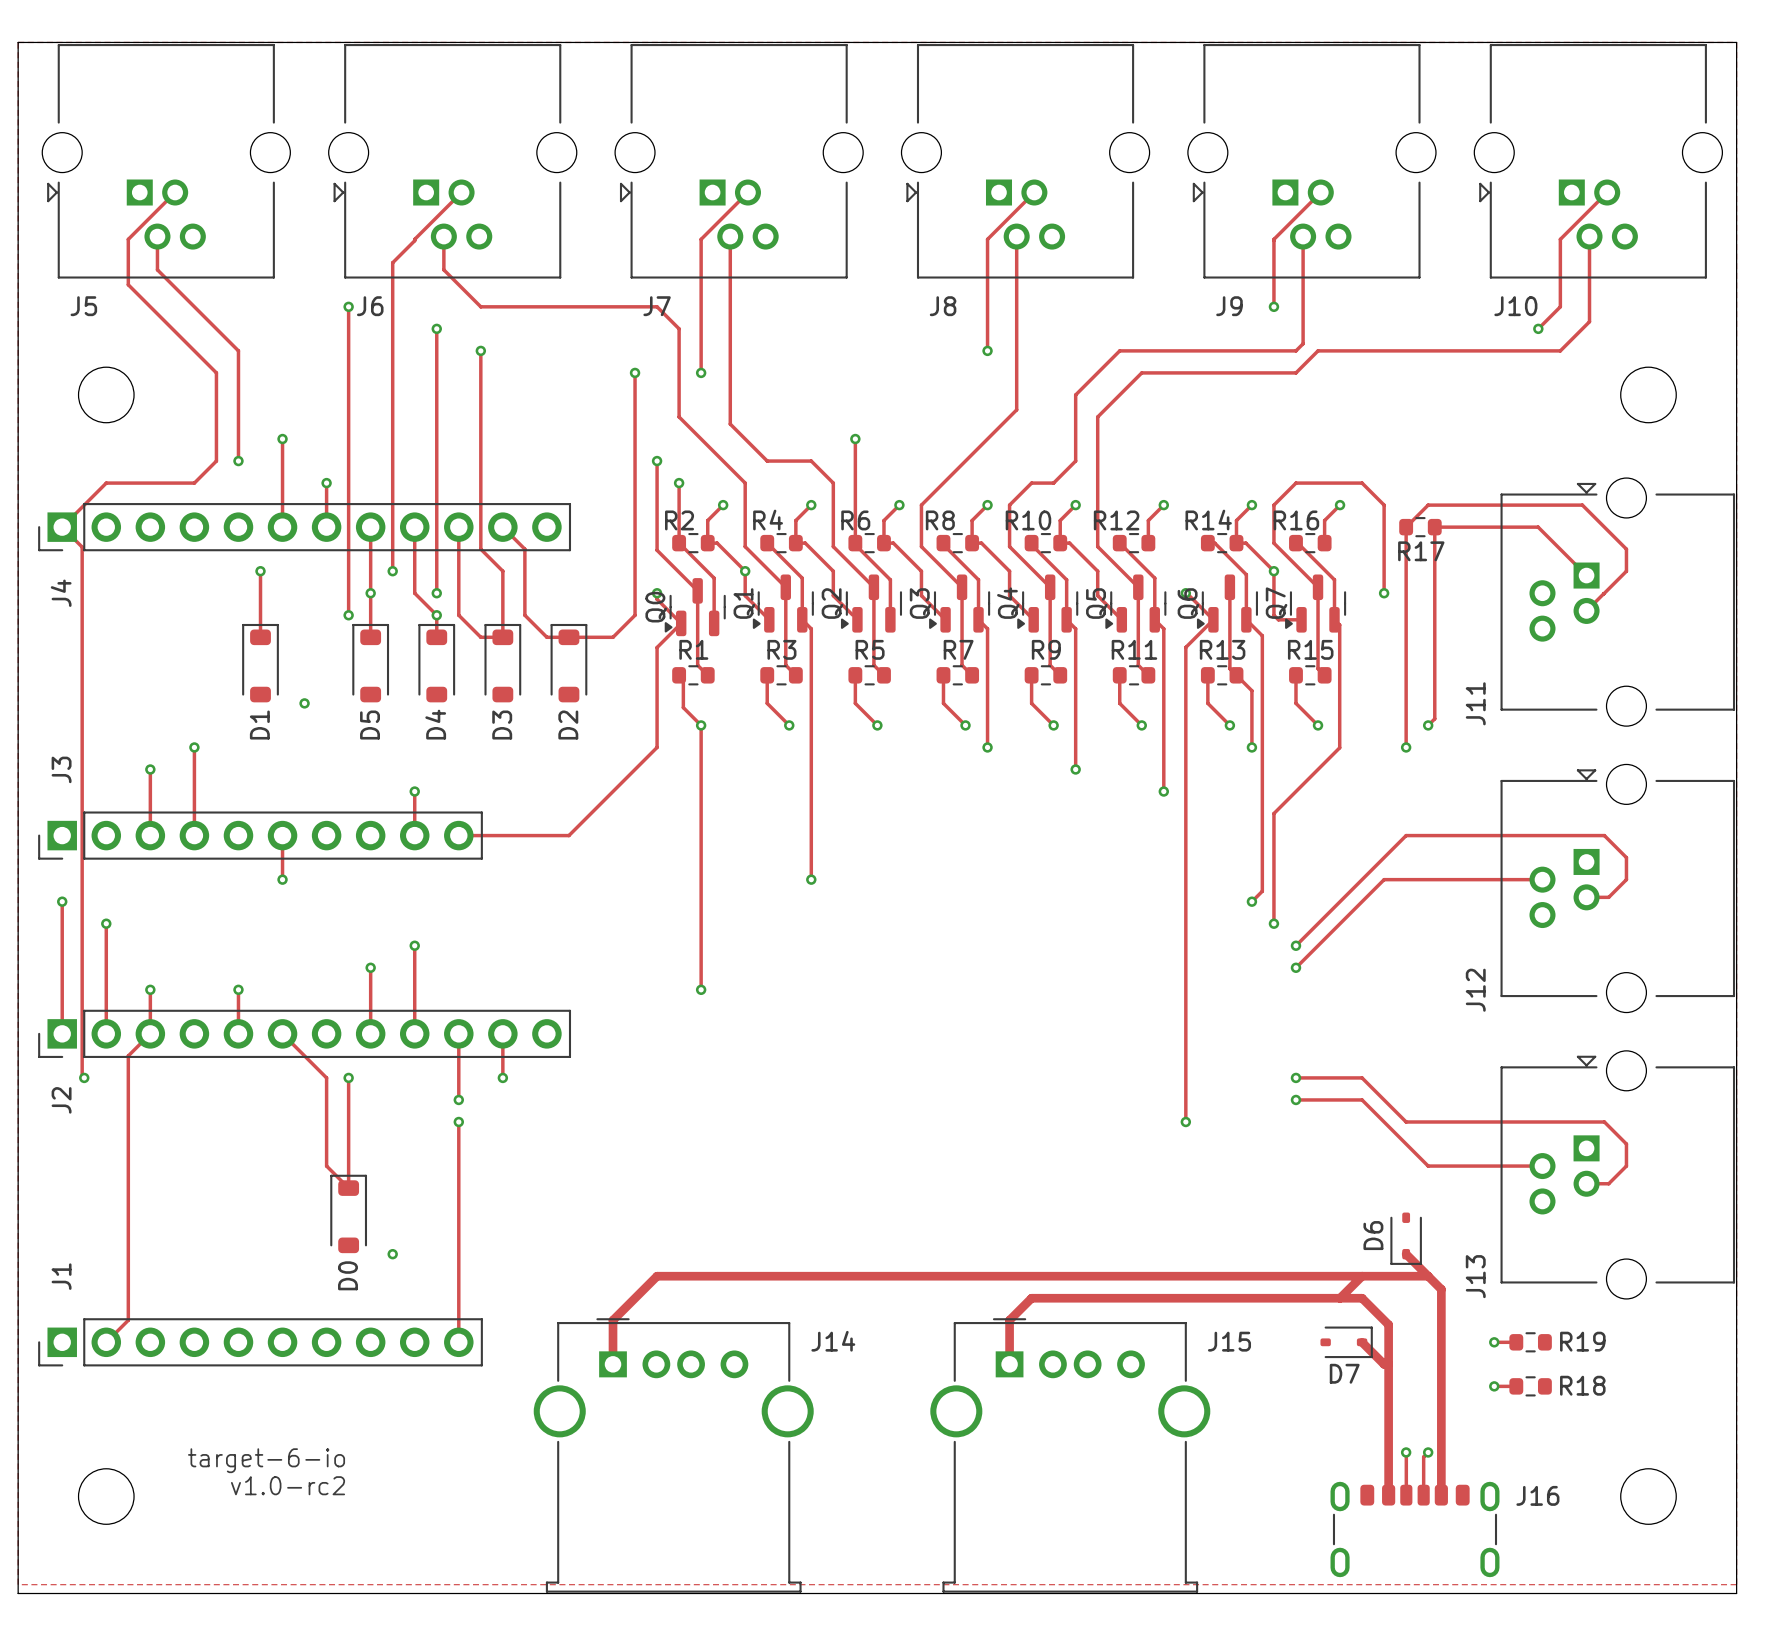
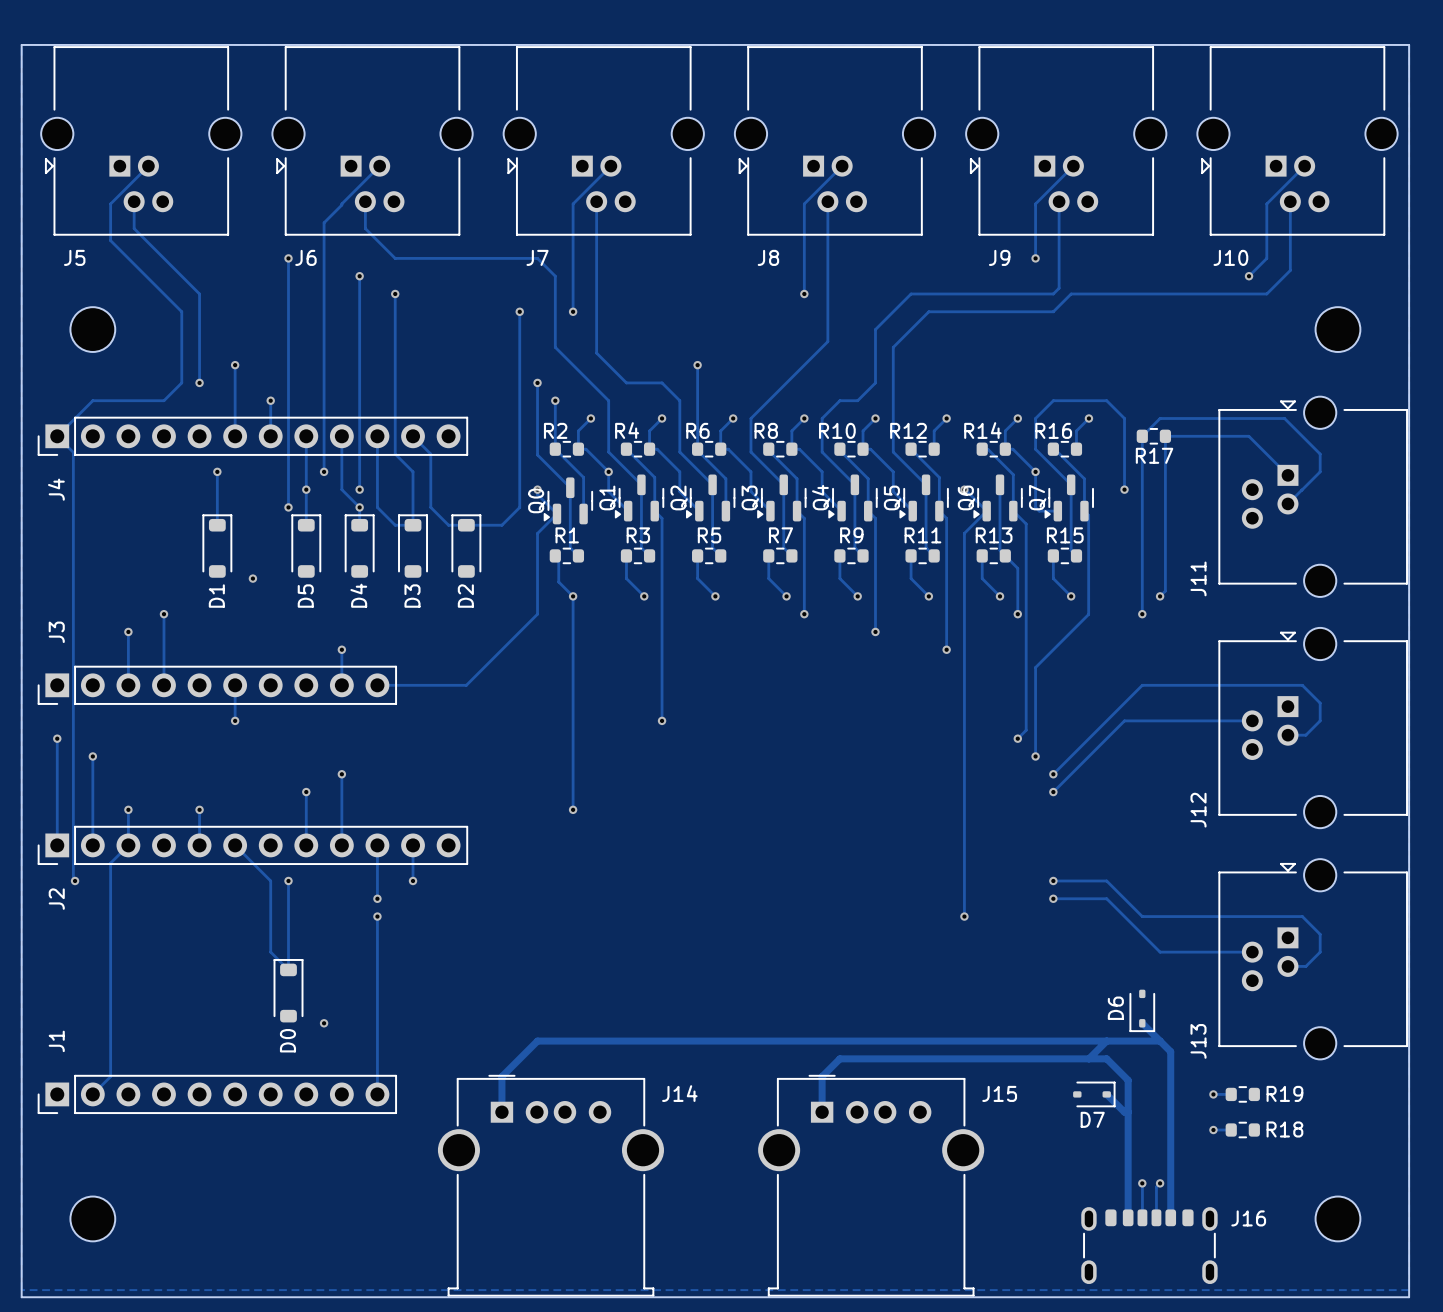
text: target-6-io (266, 1460) -> none
text: v1.0-rc2 (288, 1485) -> none

